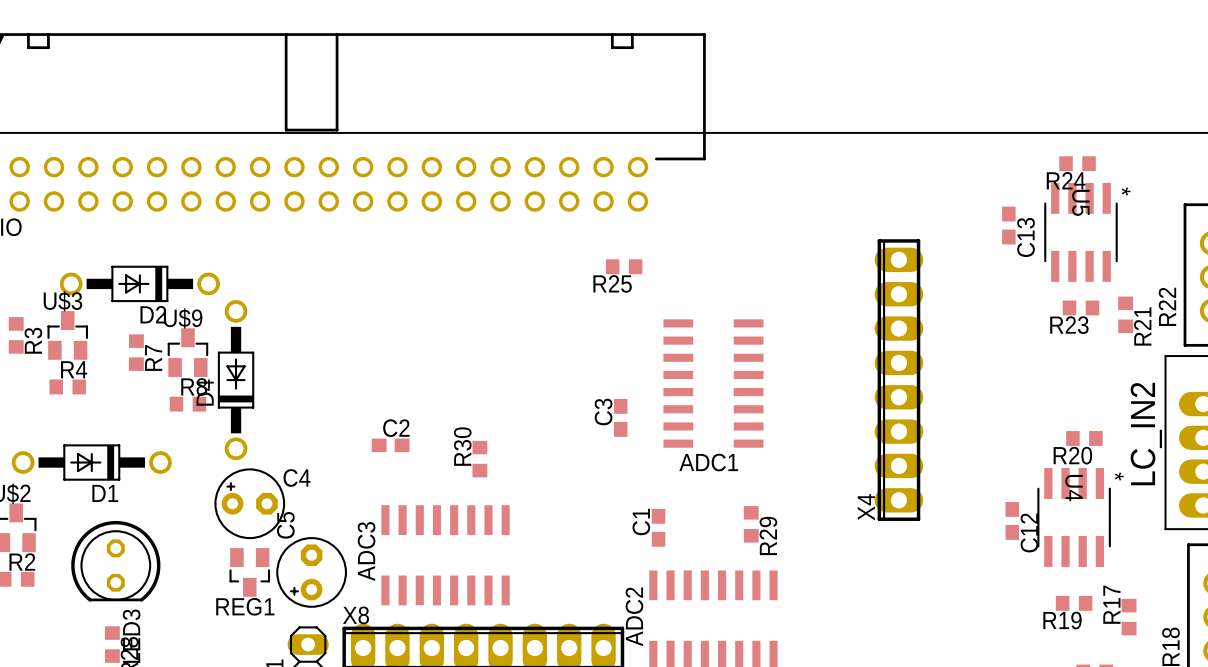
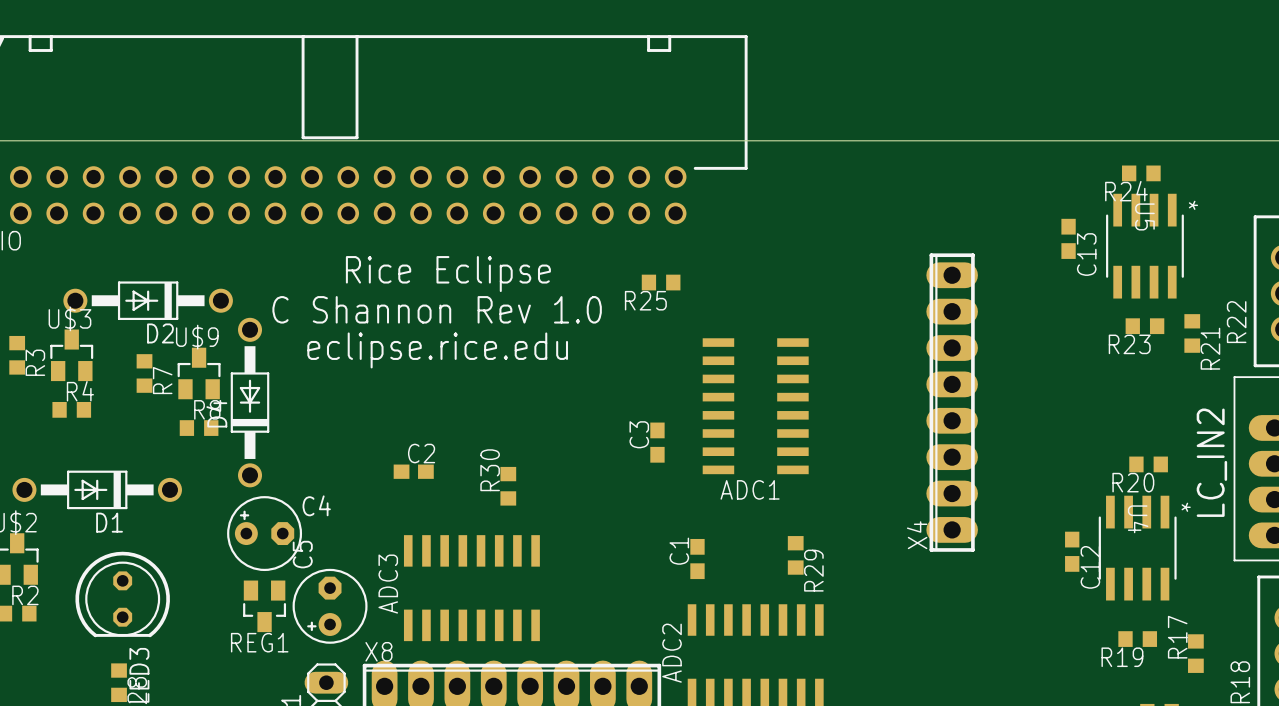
text: none -> Rice Eclipse (448, 274)
text: none -> C Shannon Rev 1.0 (437, 309)
text: none -> eclipse.rice.edu (437, 350)

